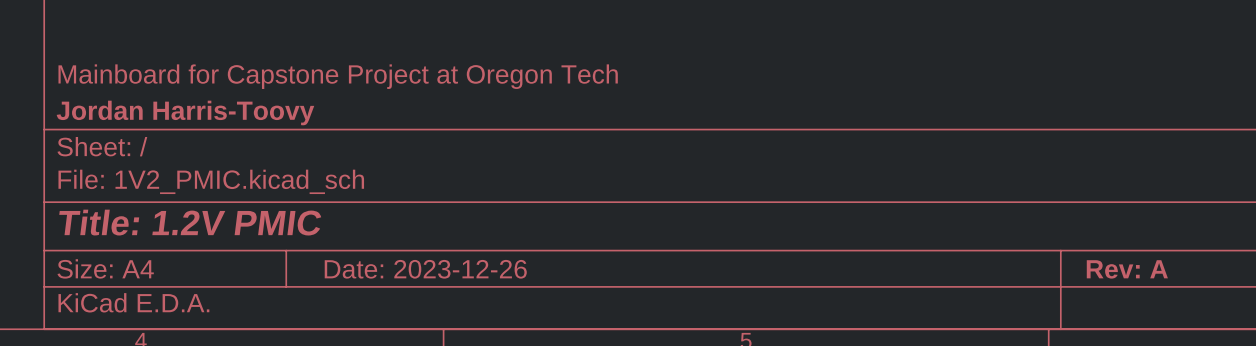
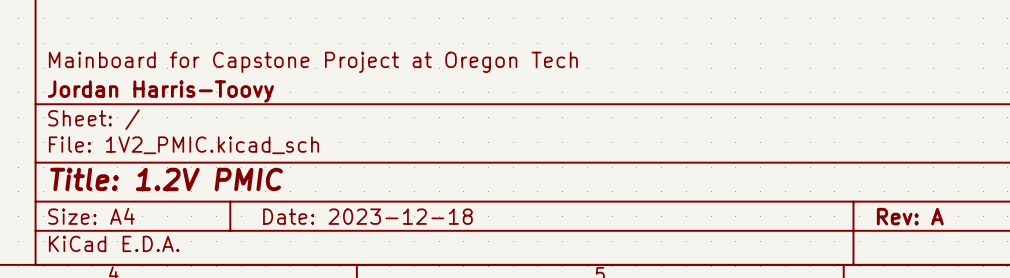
title block: Date: 2023-12-26 (425, 269) -> Date: 2023-12-18 (367, 216)

